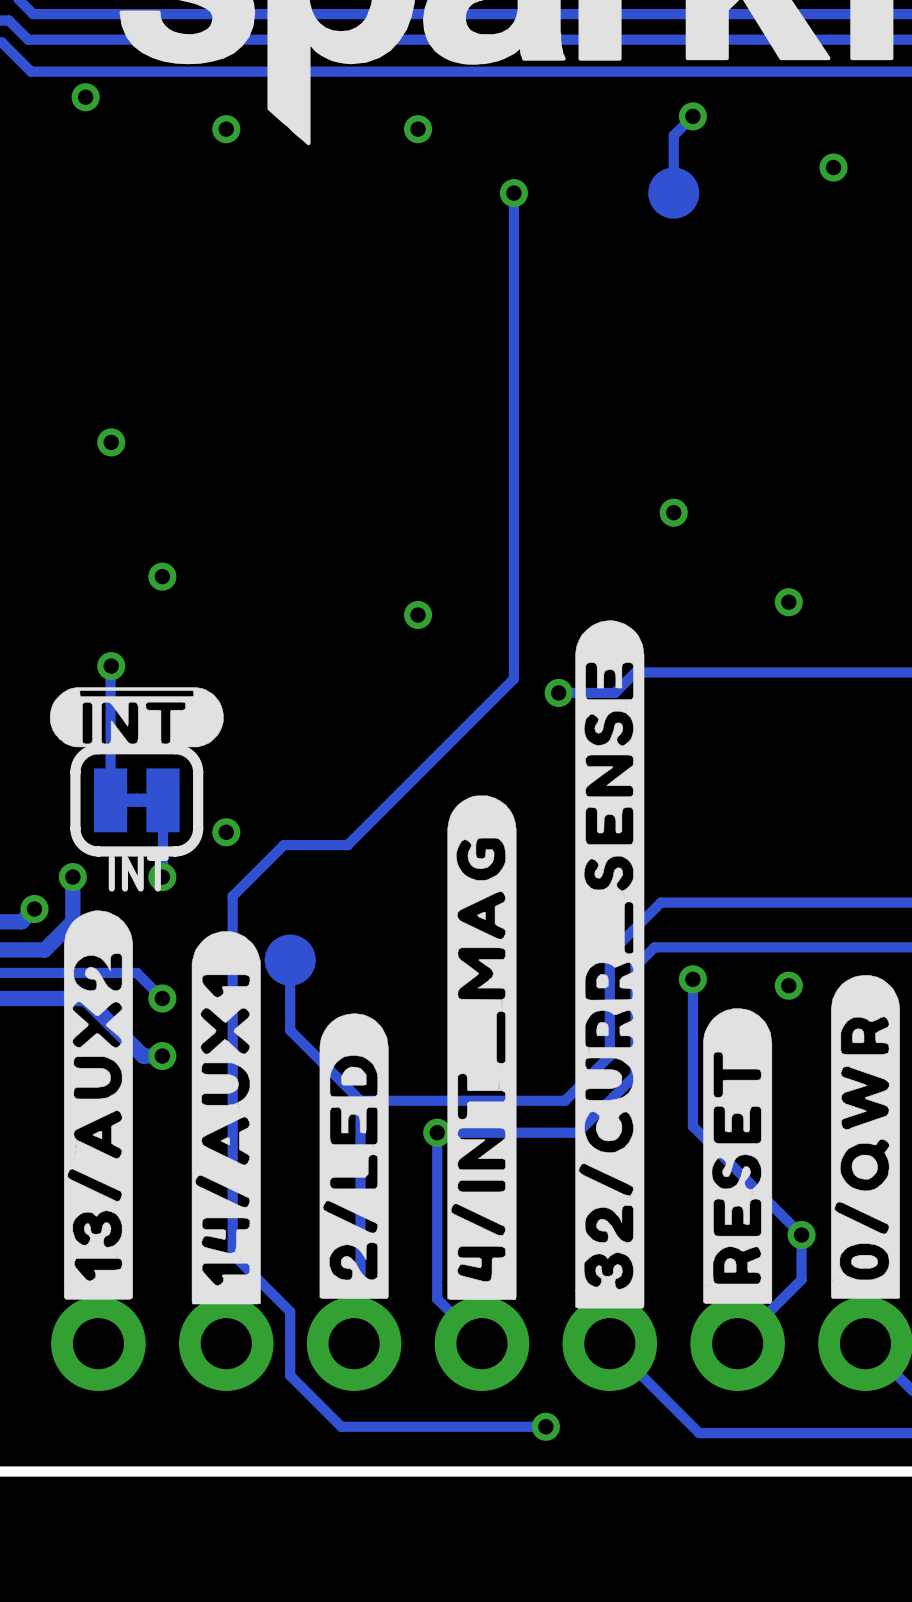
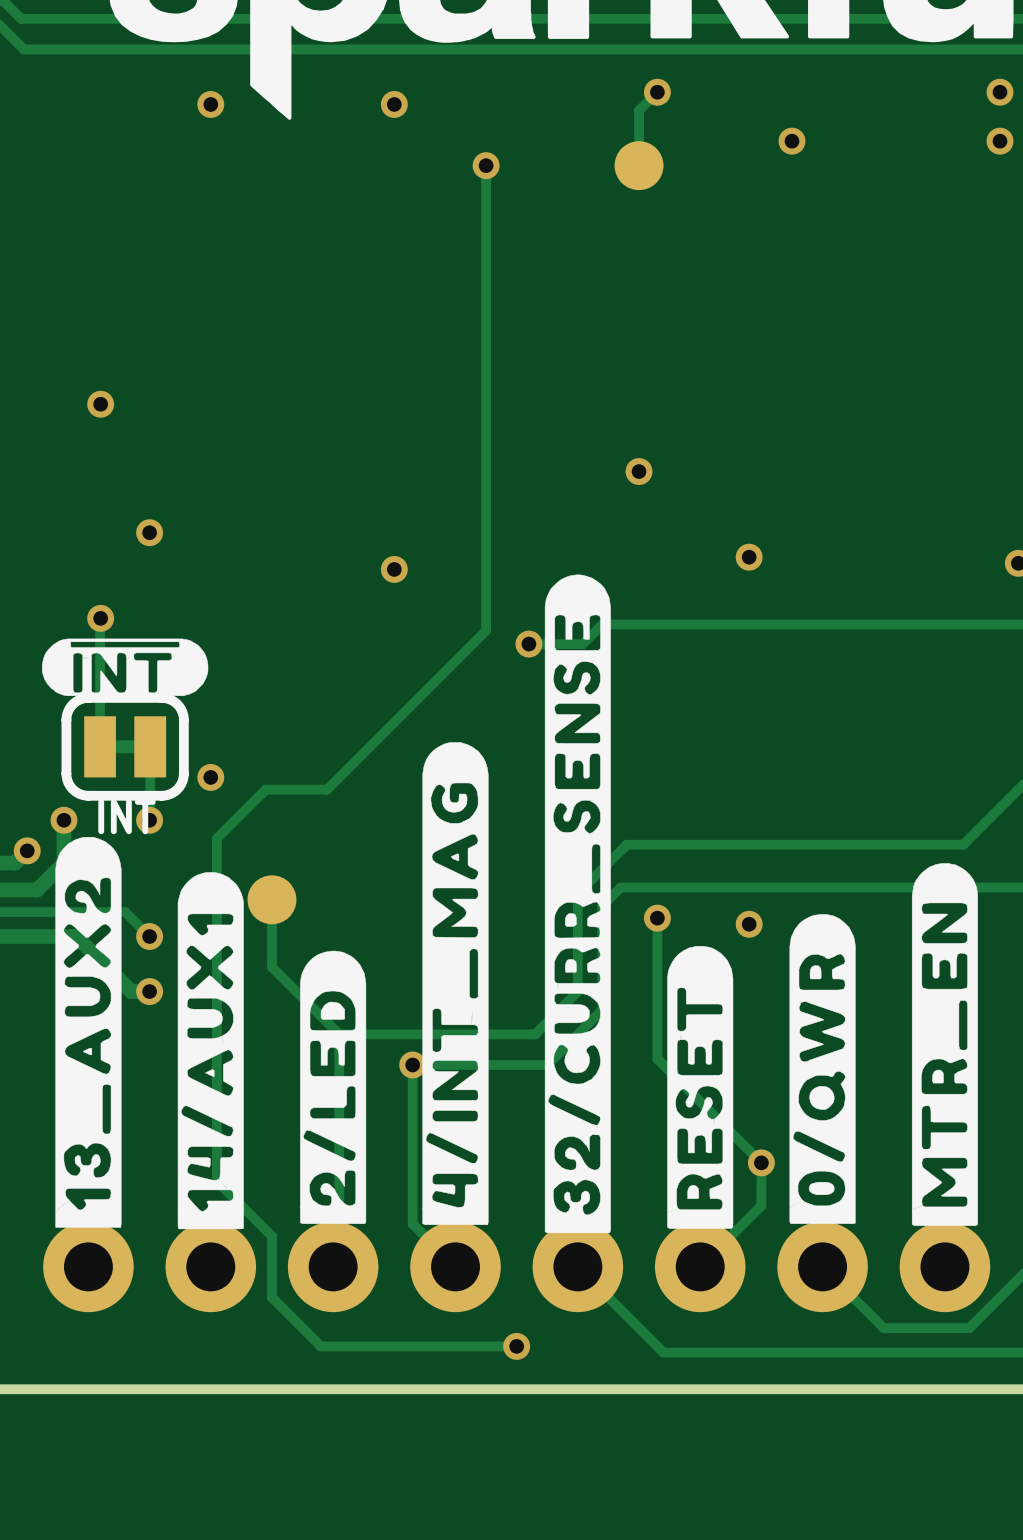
via: (85, 97) -> none
drawing shape: [63, 910, 133, 1300] -> [55, 836, 122, 1228]

